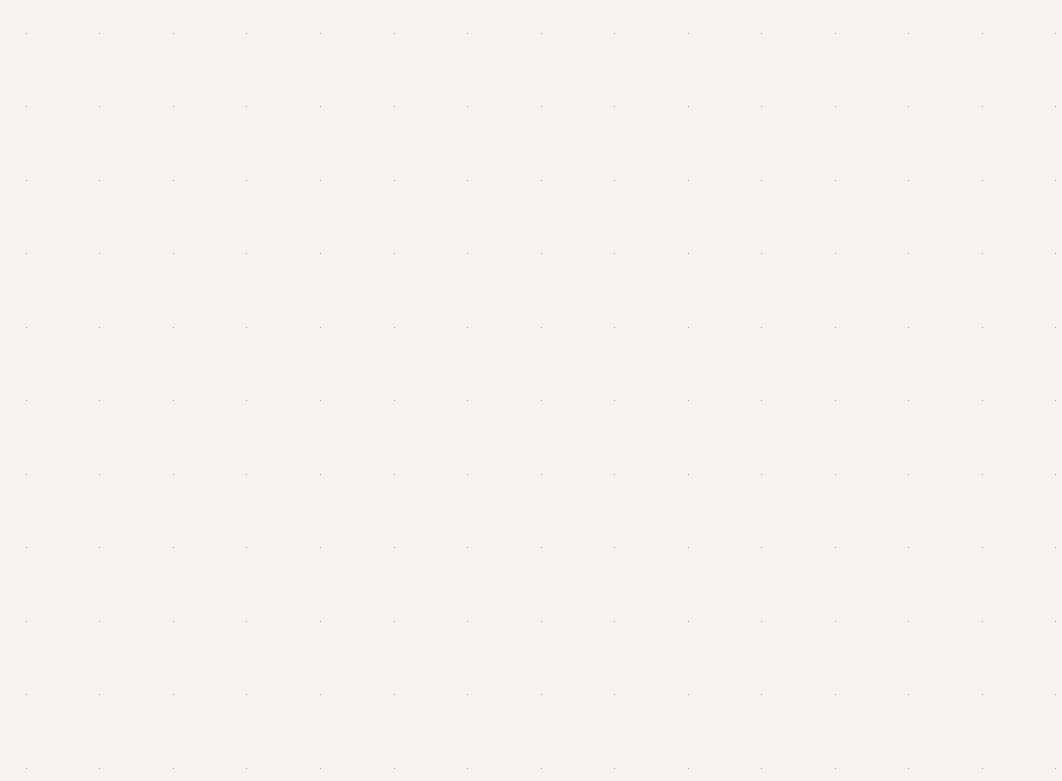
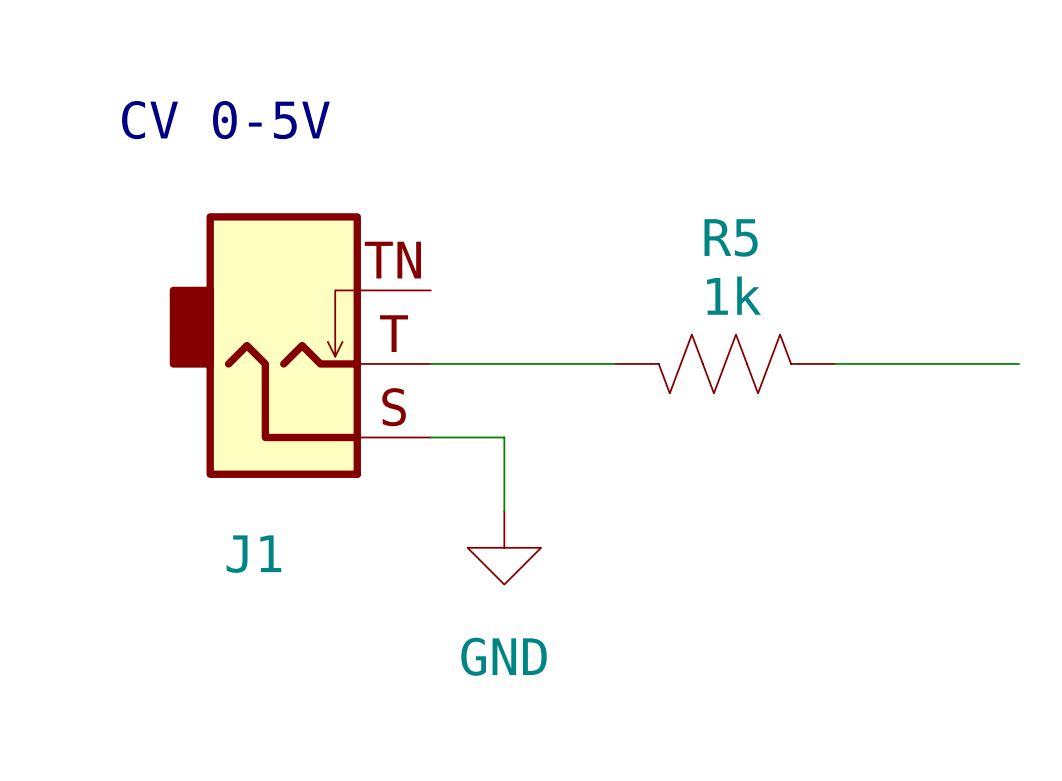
text: none -> CV 0-5V (225, 120)
J1: none -> (300, 345)
wire: none -> (430, 363) (614, 363)
R5: none -> 1k (724, 363)
wire: none -> (835, 363) (1019, 363)
wire: none -> (430, 437) (504, 437) (504, 511)
power symbol: none -> GND (504, 547)

